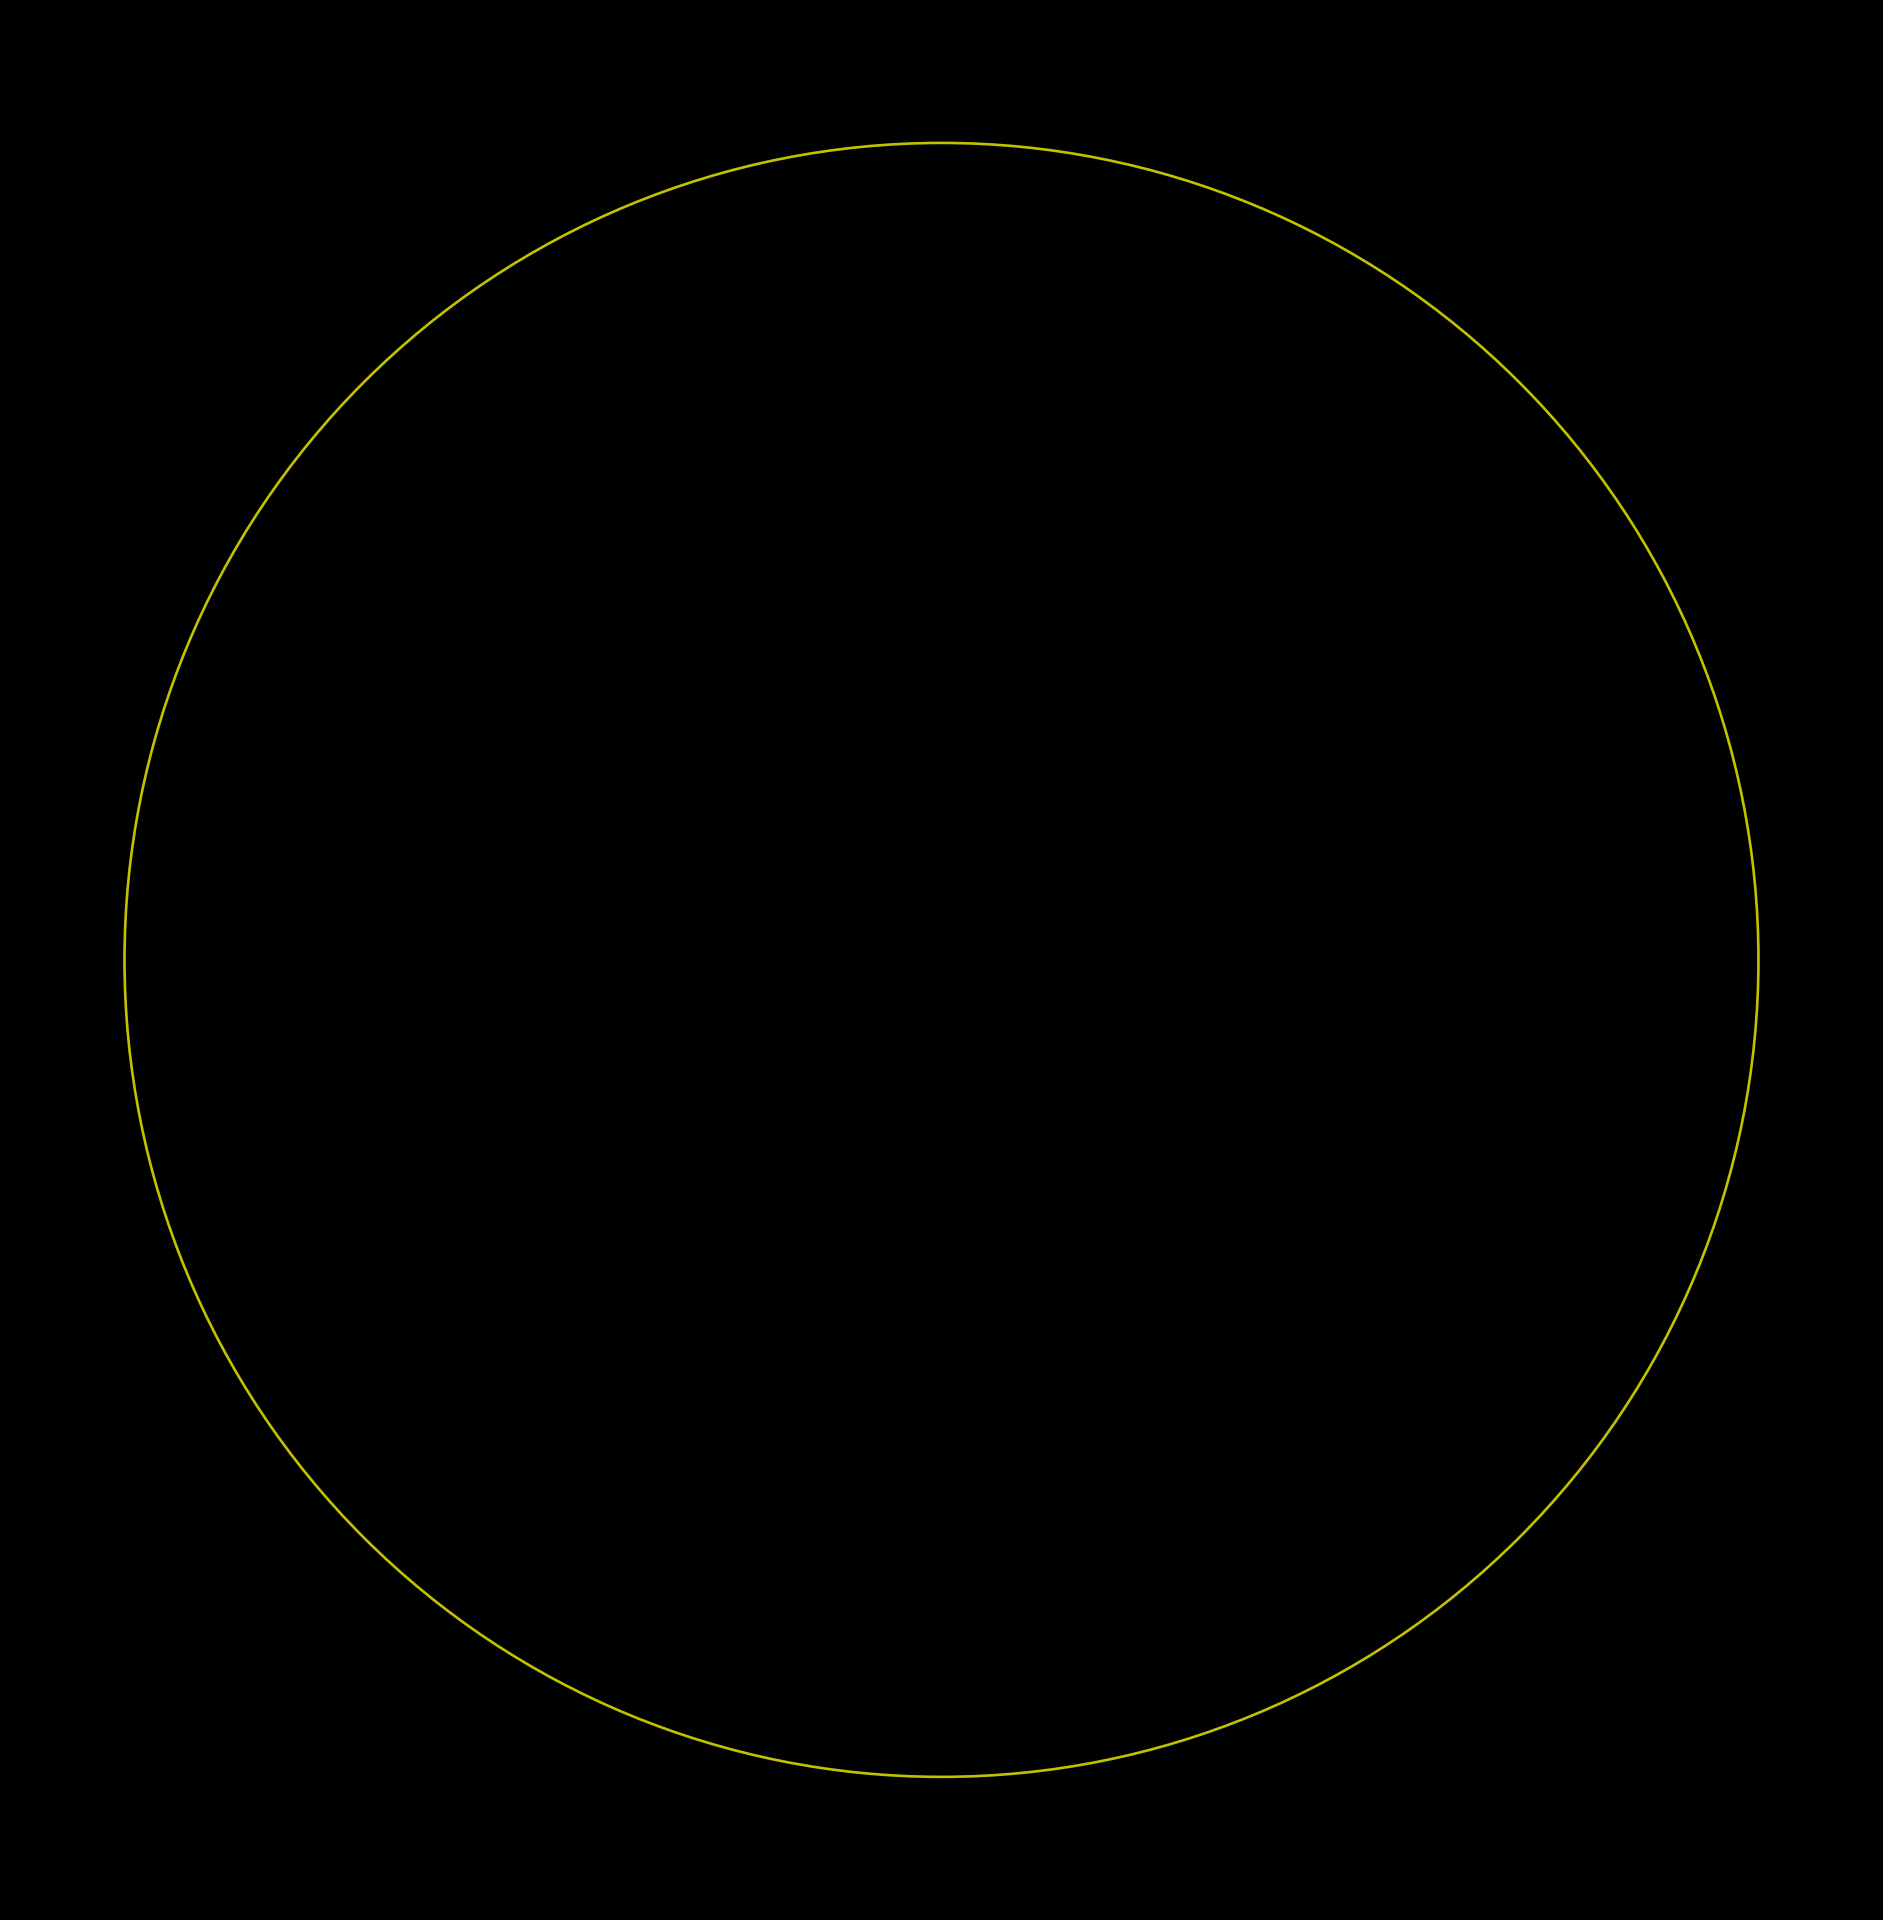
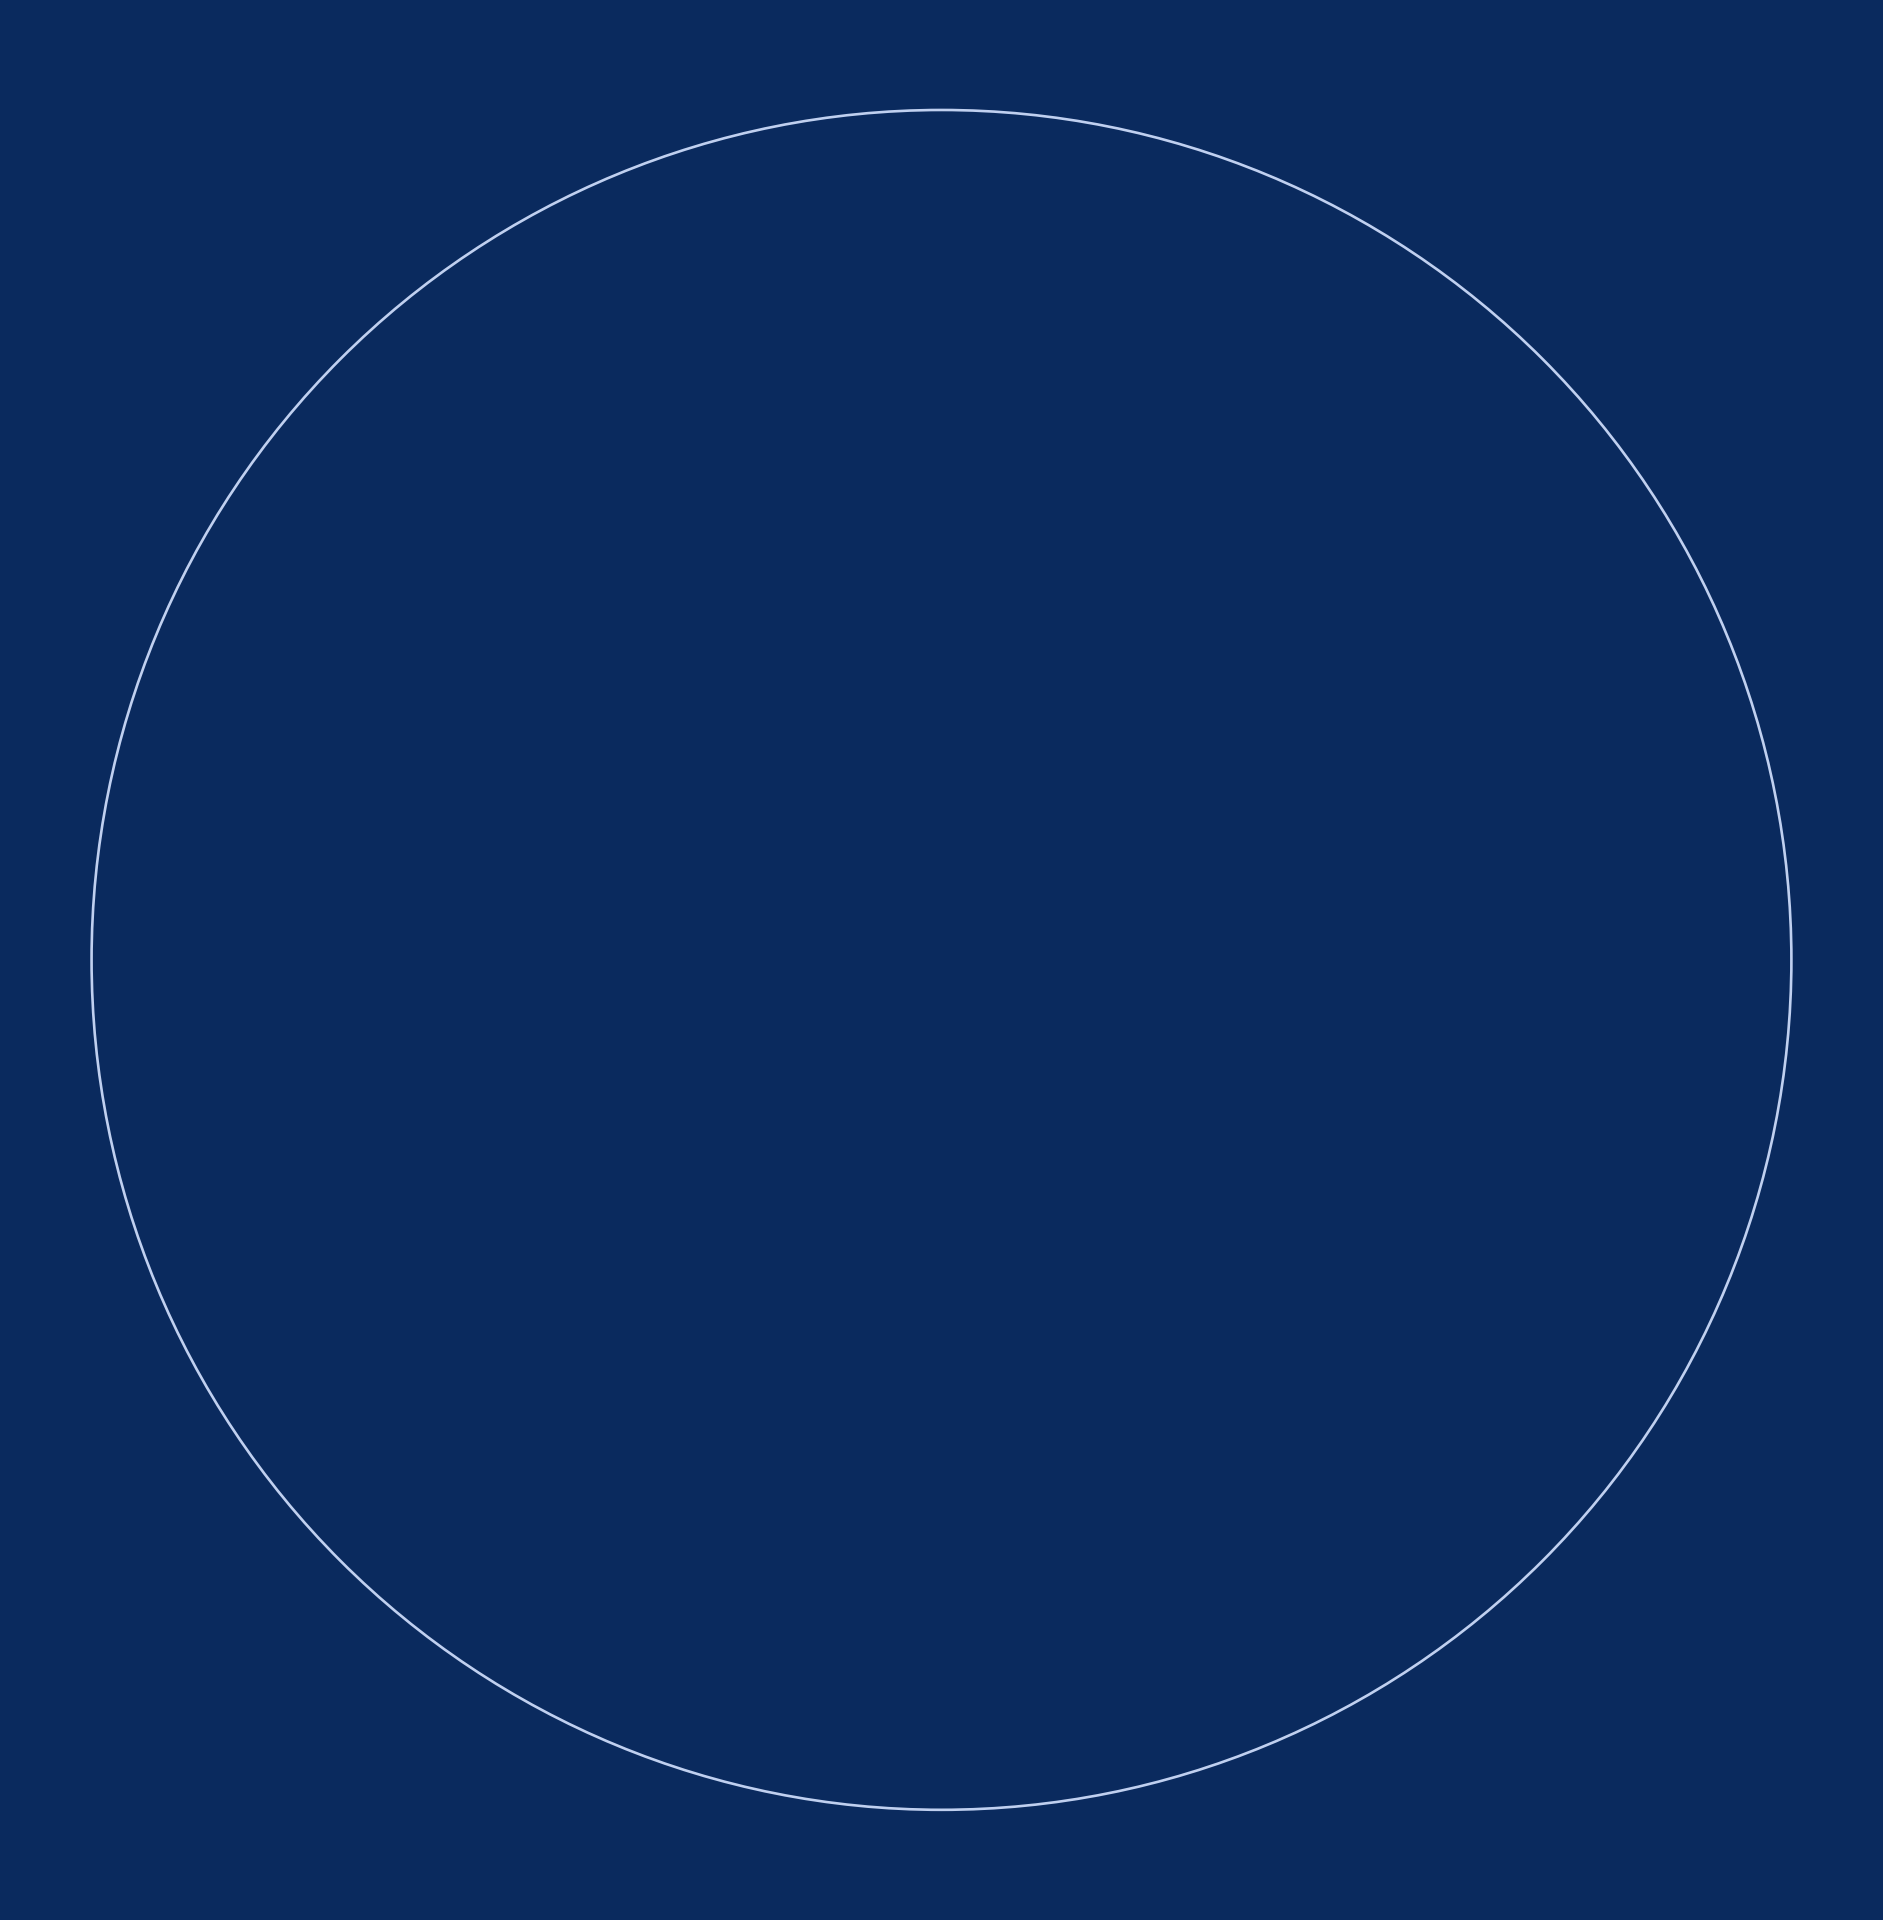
round board edge size: [123, 141, 1760, 1779] -> [90, 108, 1793, 1812]

